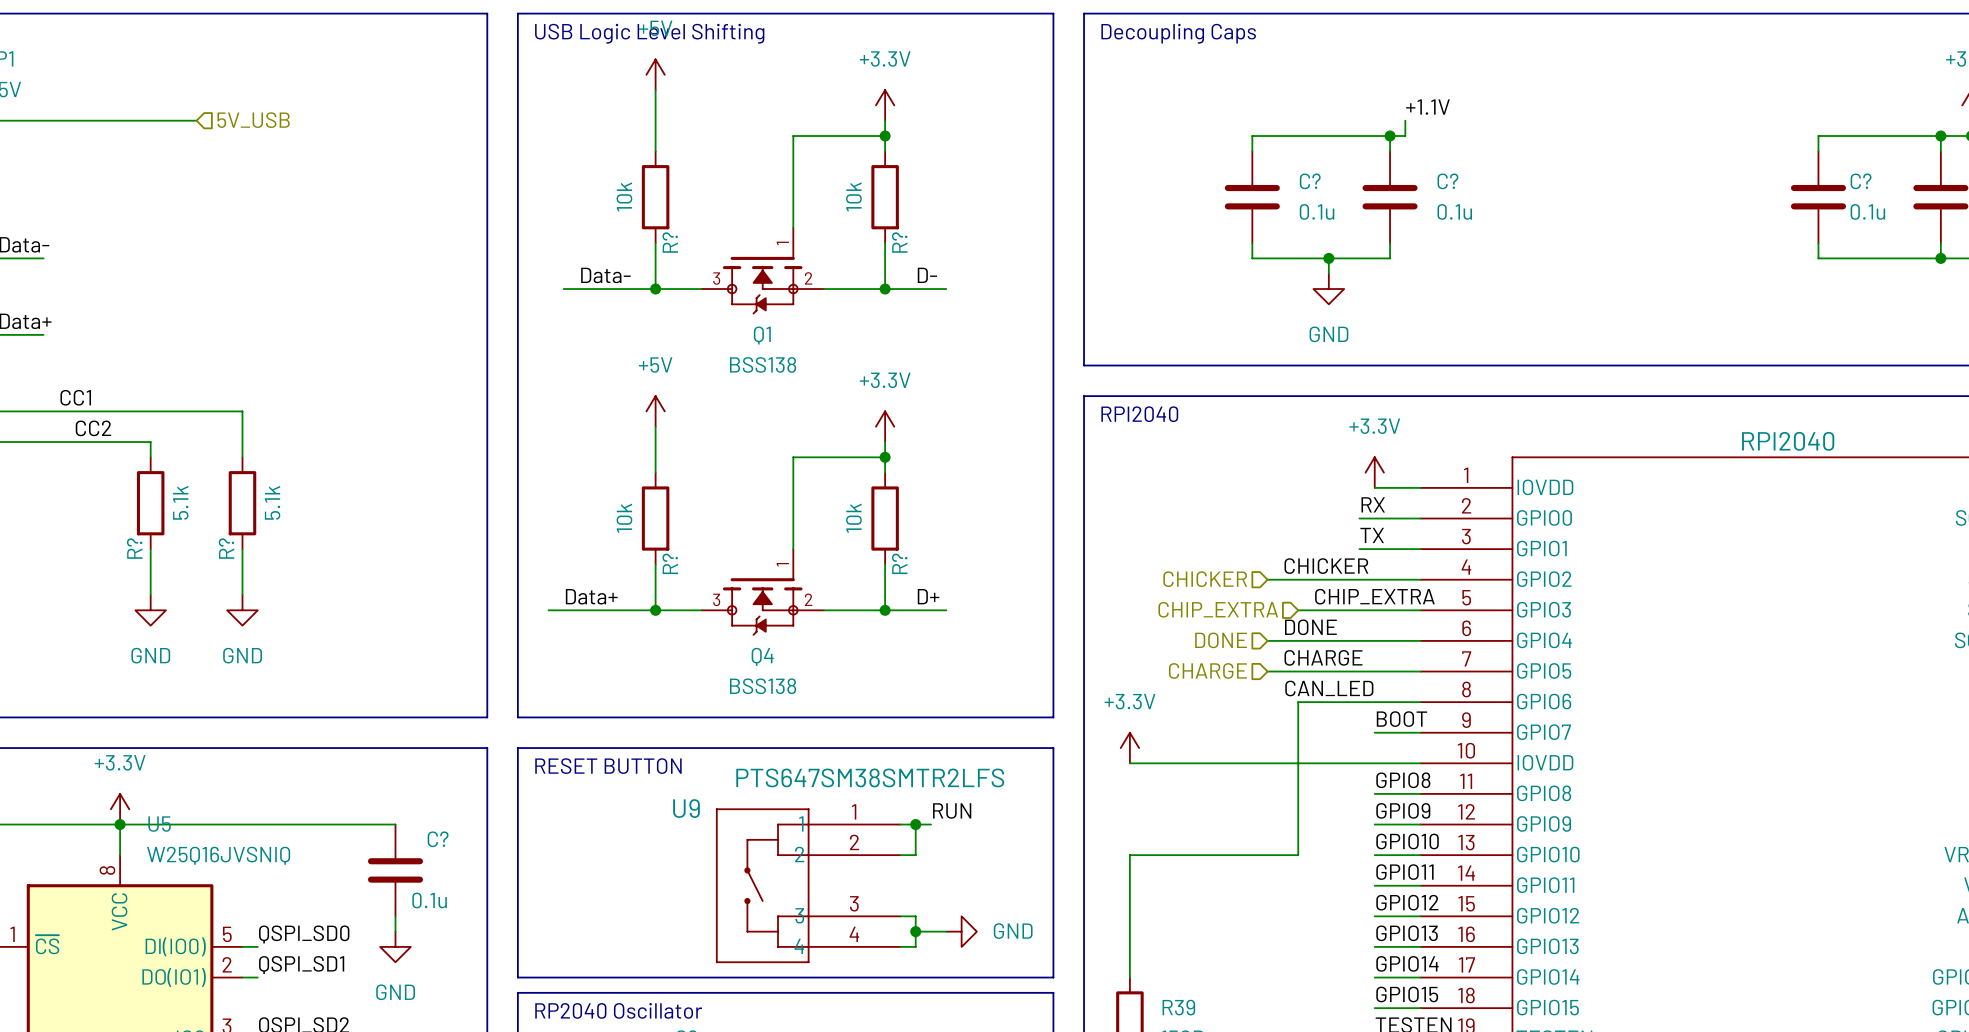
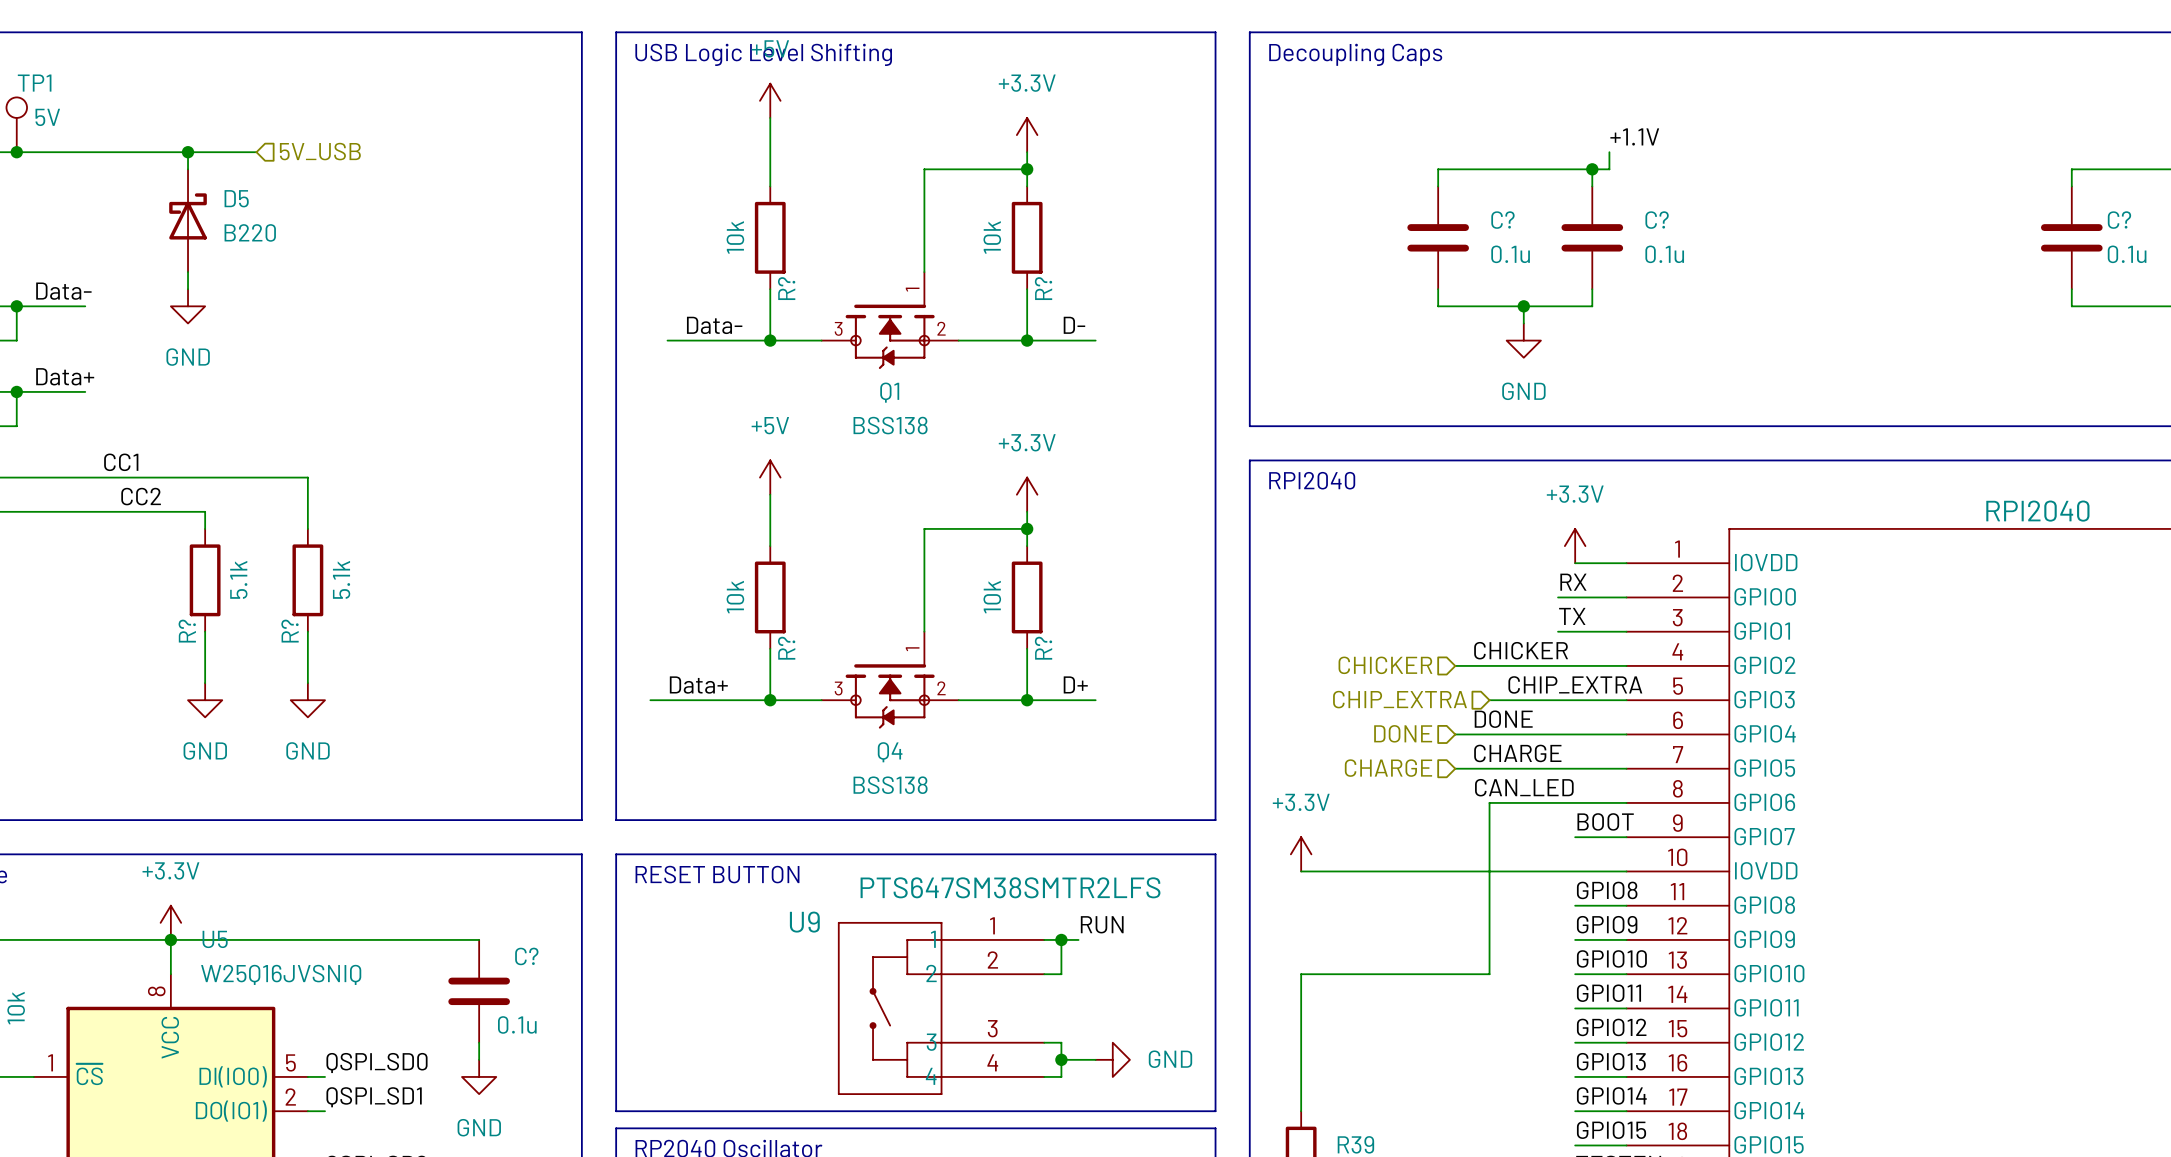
wire: none -> (188, 152) (188, 169)
junction: none -> (188, 152)
D5: none -> B220 (188, 220)
wire: none -> (188, 272) (188, 289)
power symbol: none -> GND (188, 306)

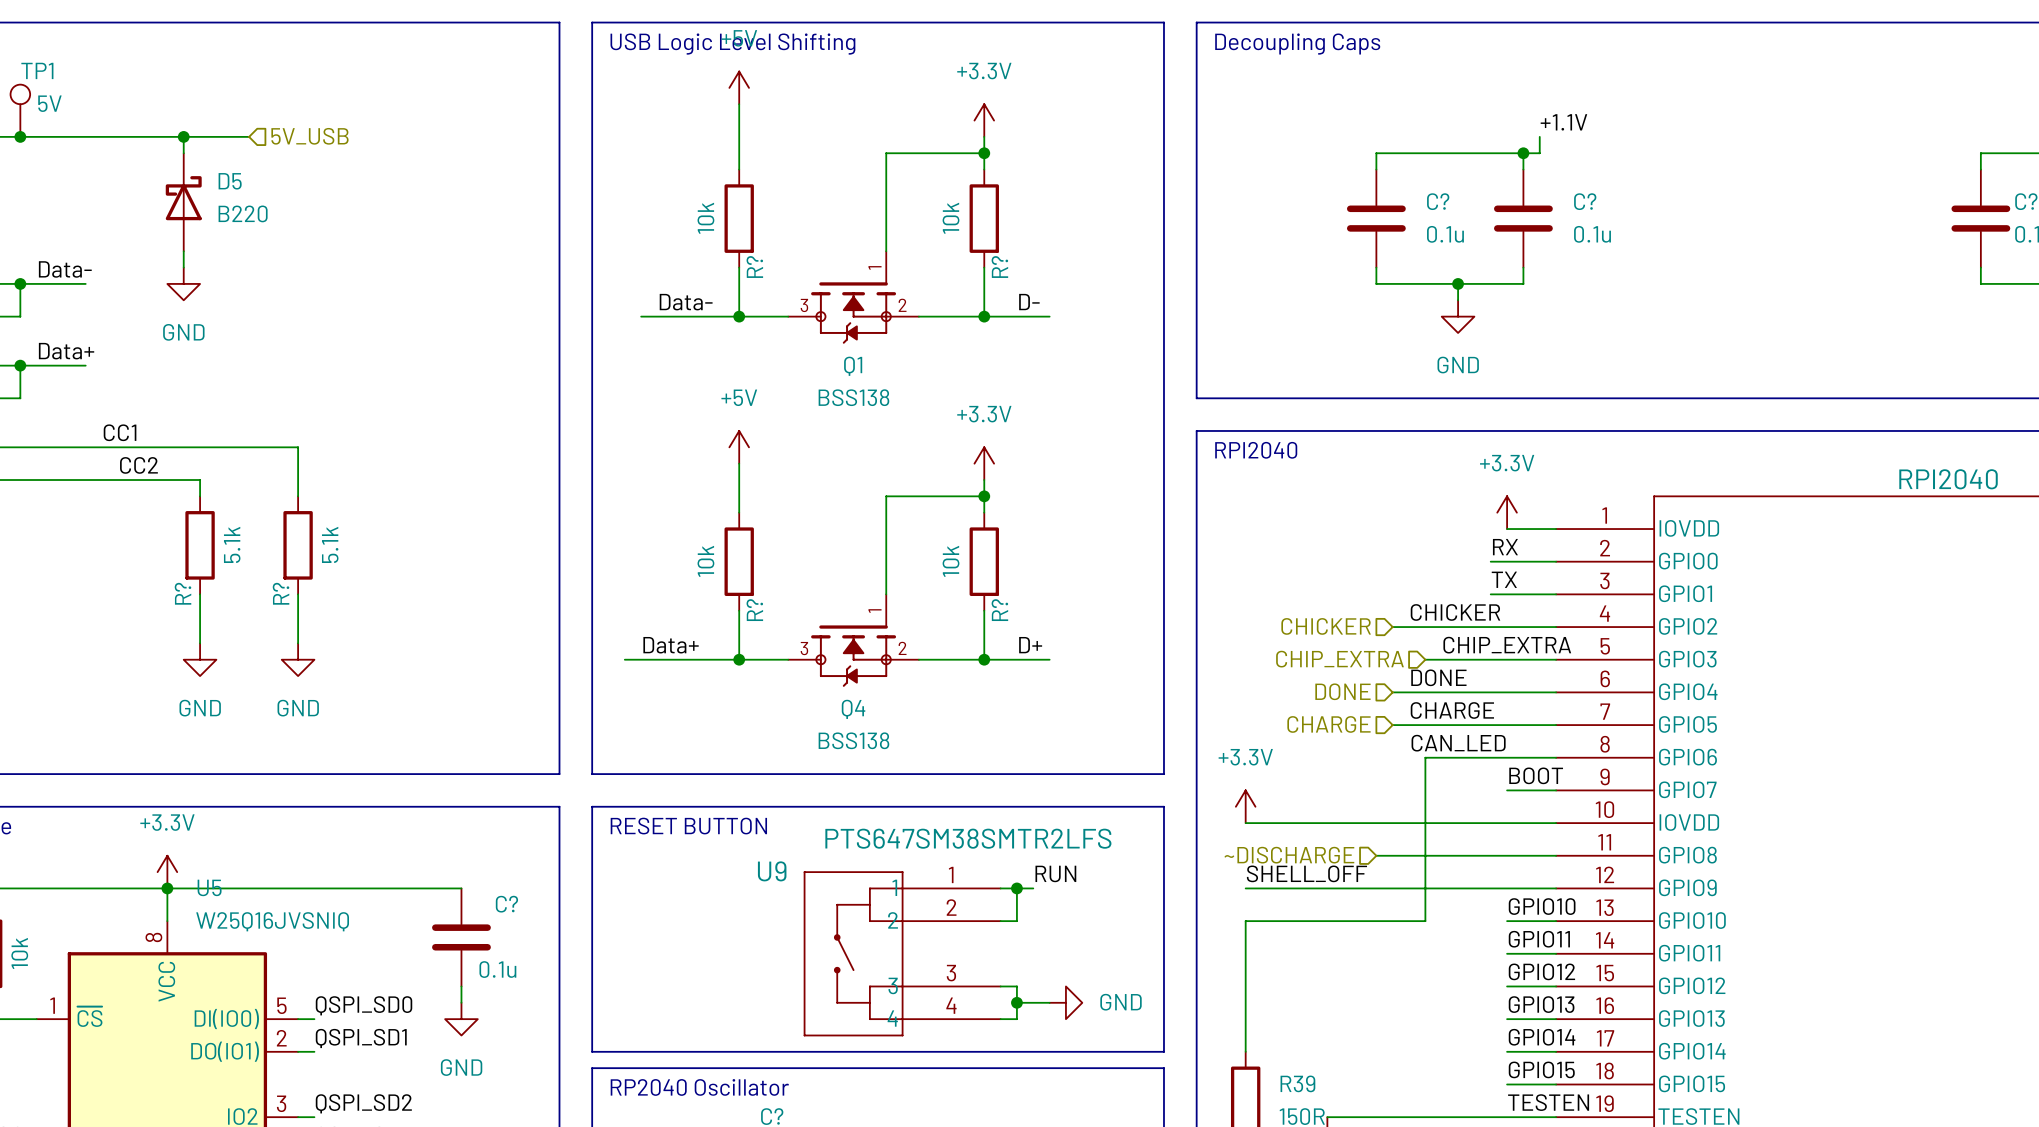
label: GPIO8 (1607, 890) -> none
hierarchical label: none -> ~DISCHARGE (1289, 855)
wire: none -> (1376, 855) (1507, 855)
label: none -> SHELL_OFF (1306, 873)
label: GPIO9 (1607, 924) -> none
wire: none -> (1245, 888) (1507, 888)

